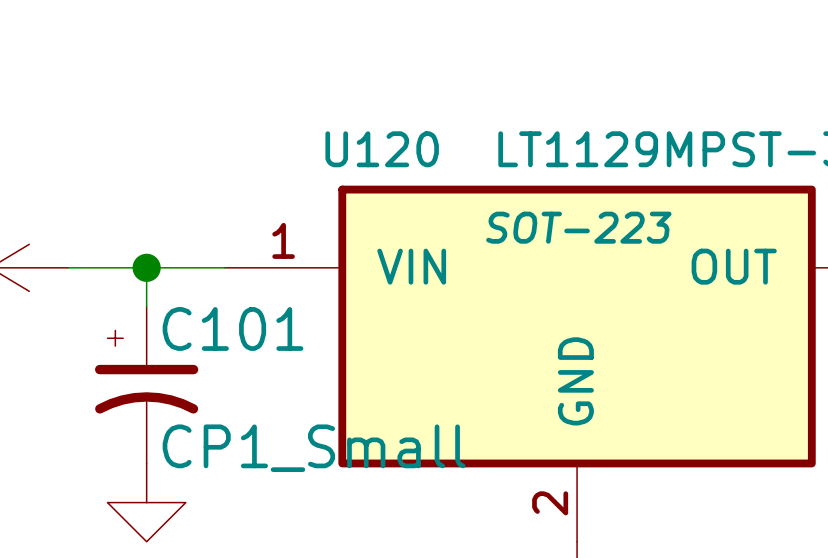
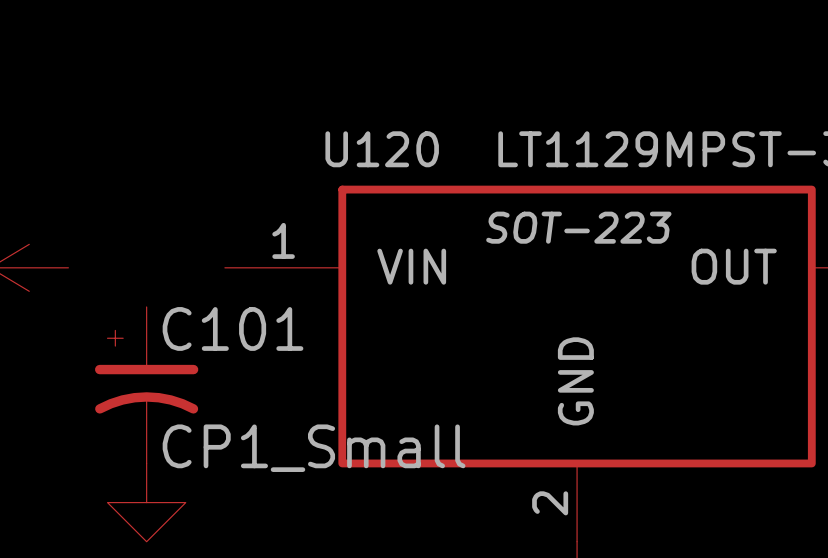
wire: (68, 267) (224, 267) -> none
wire: (146, 267) (146, 306) -> none
junction: (146, 267) -> none

